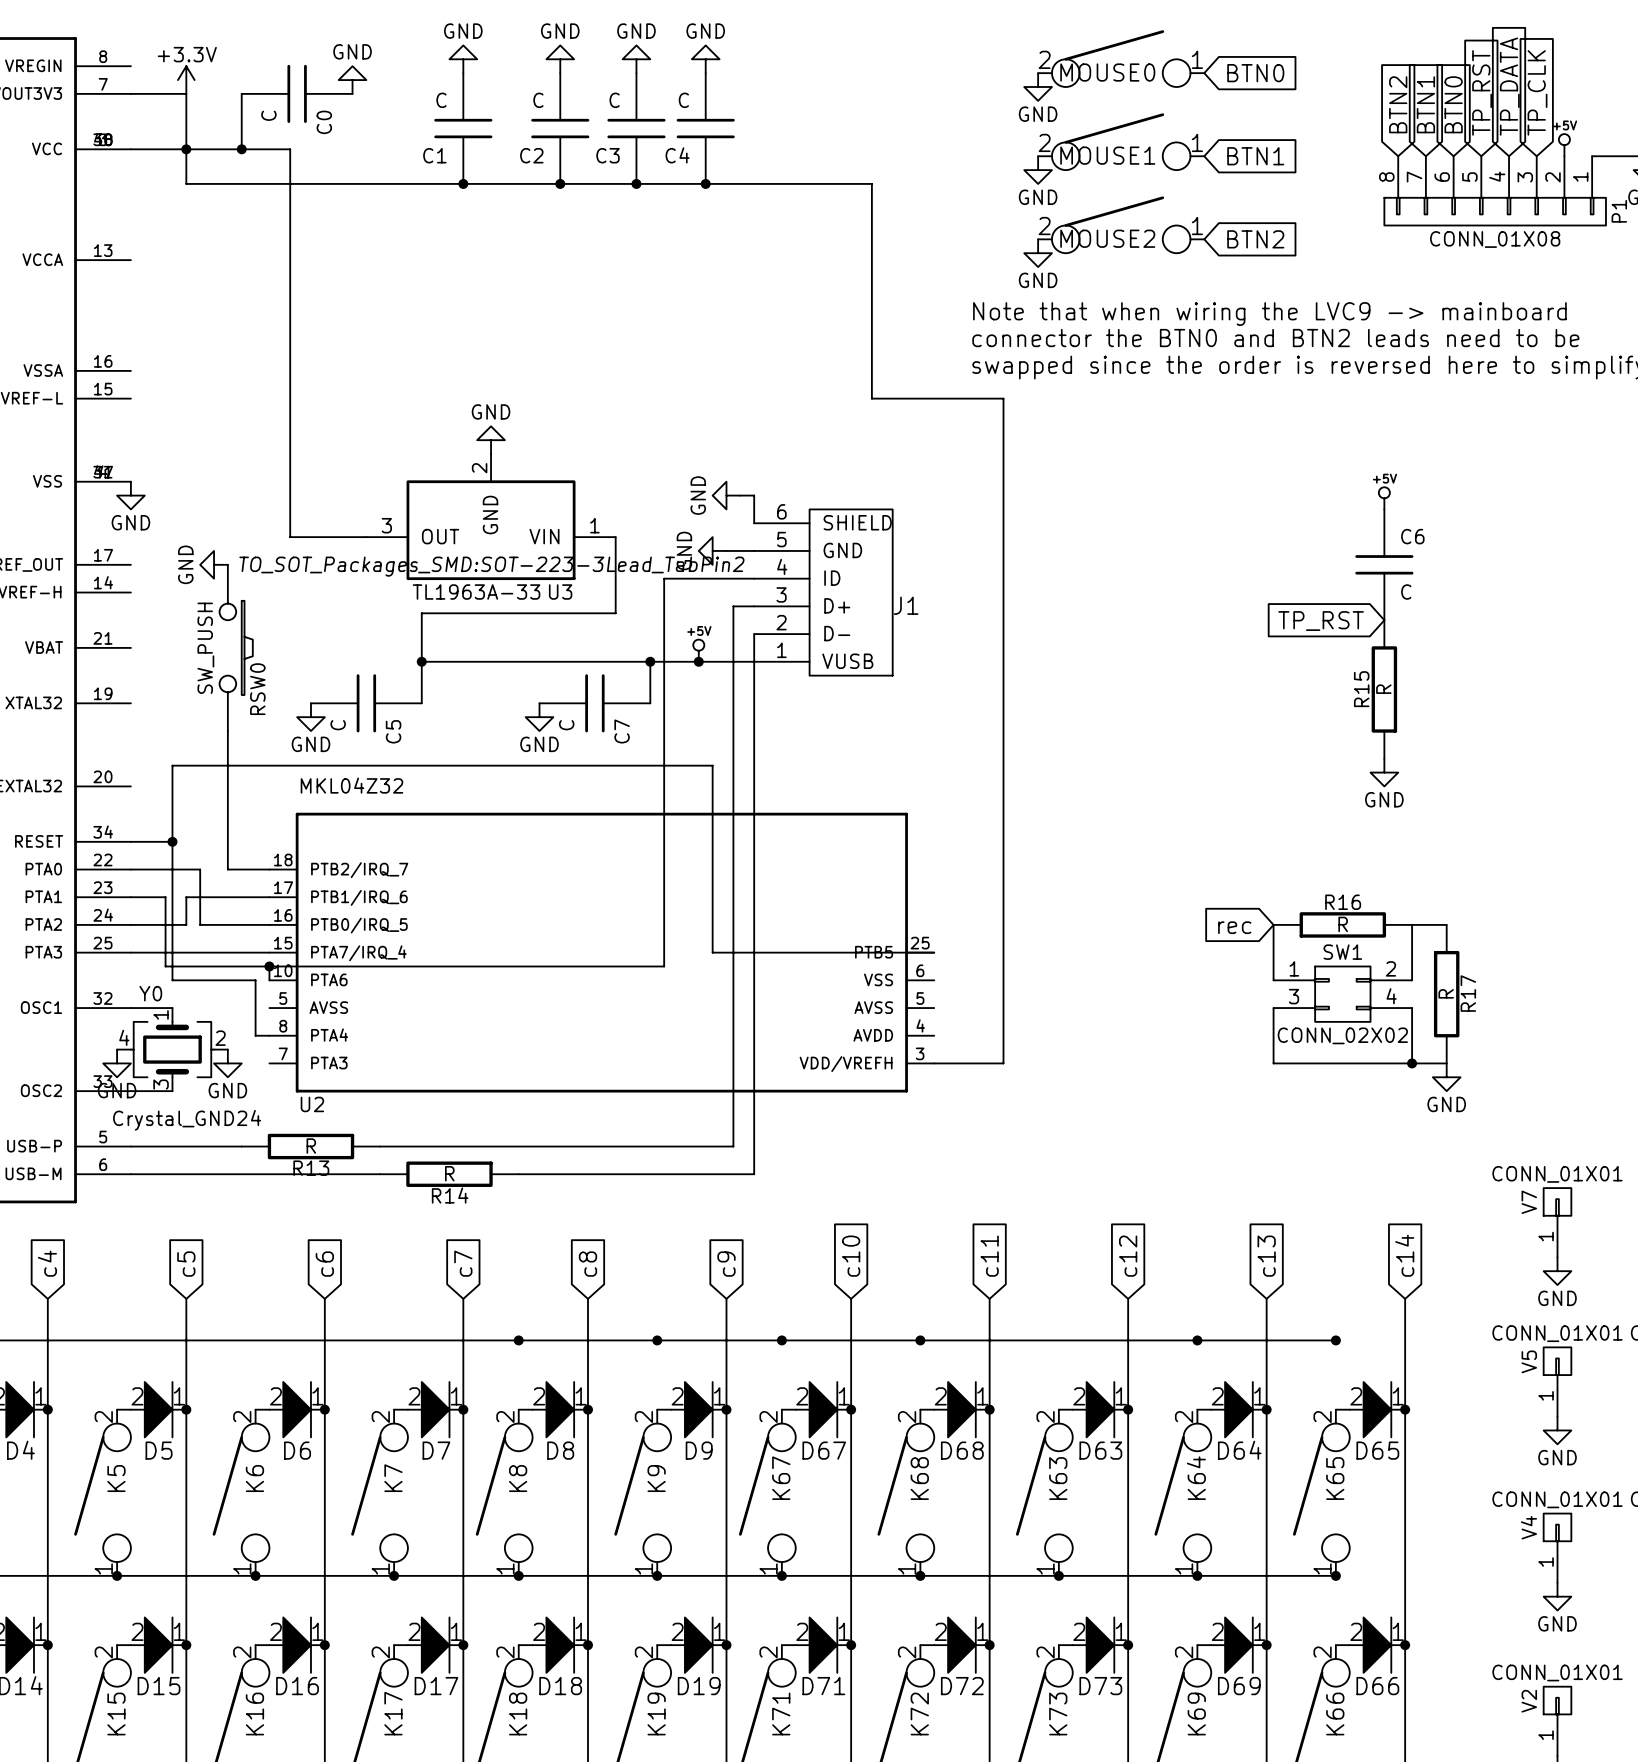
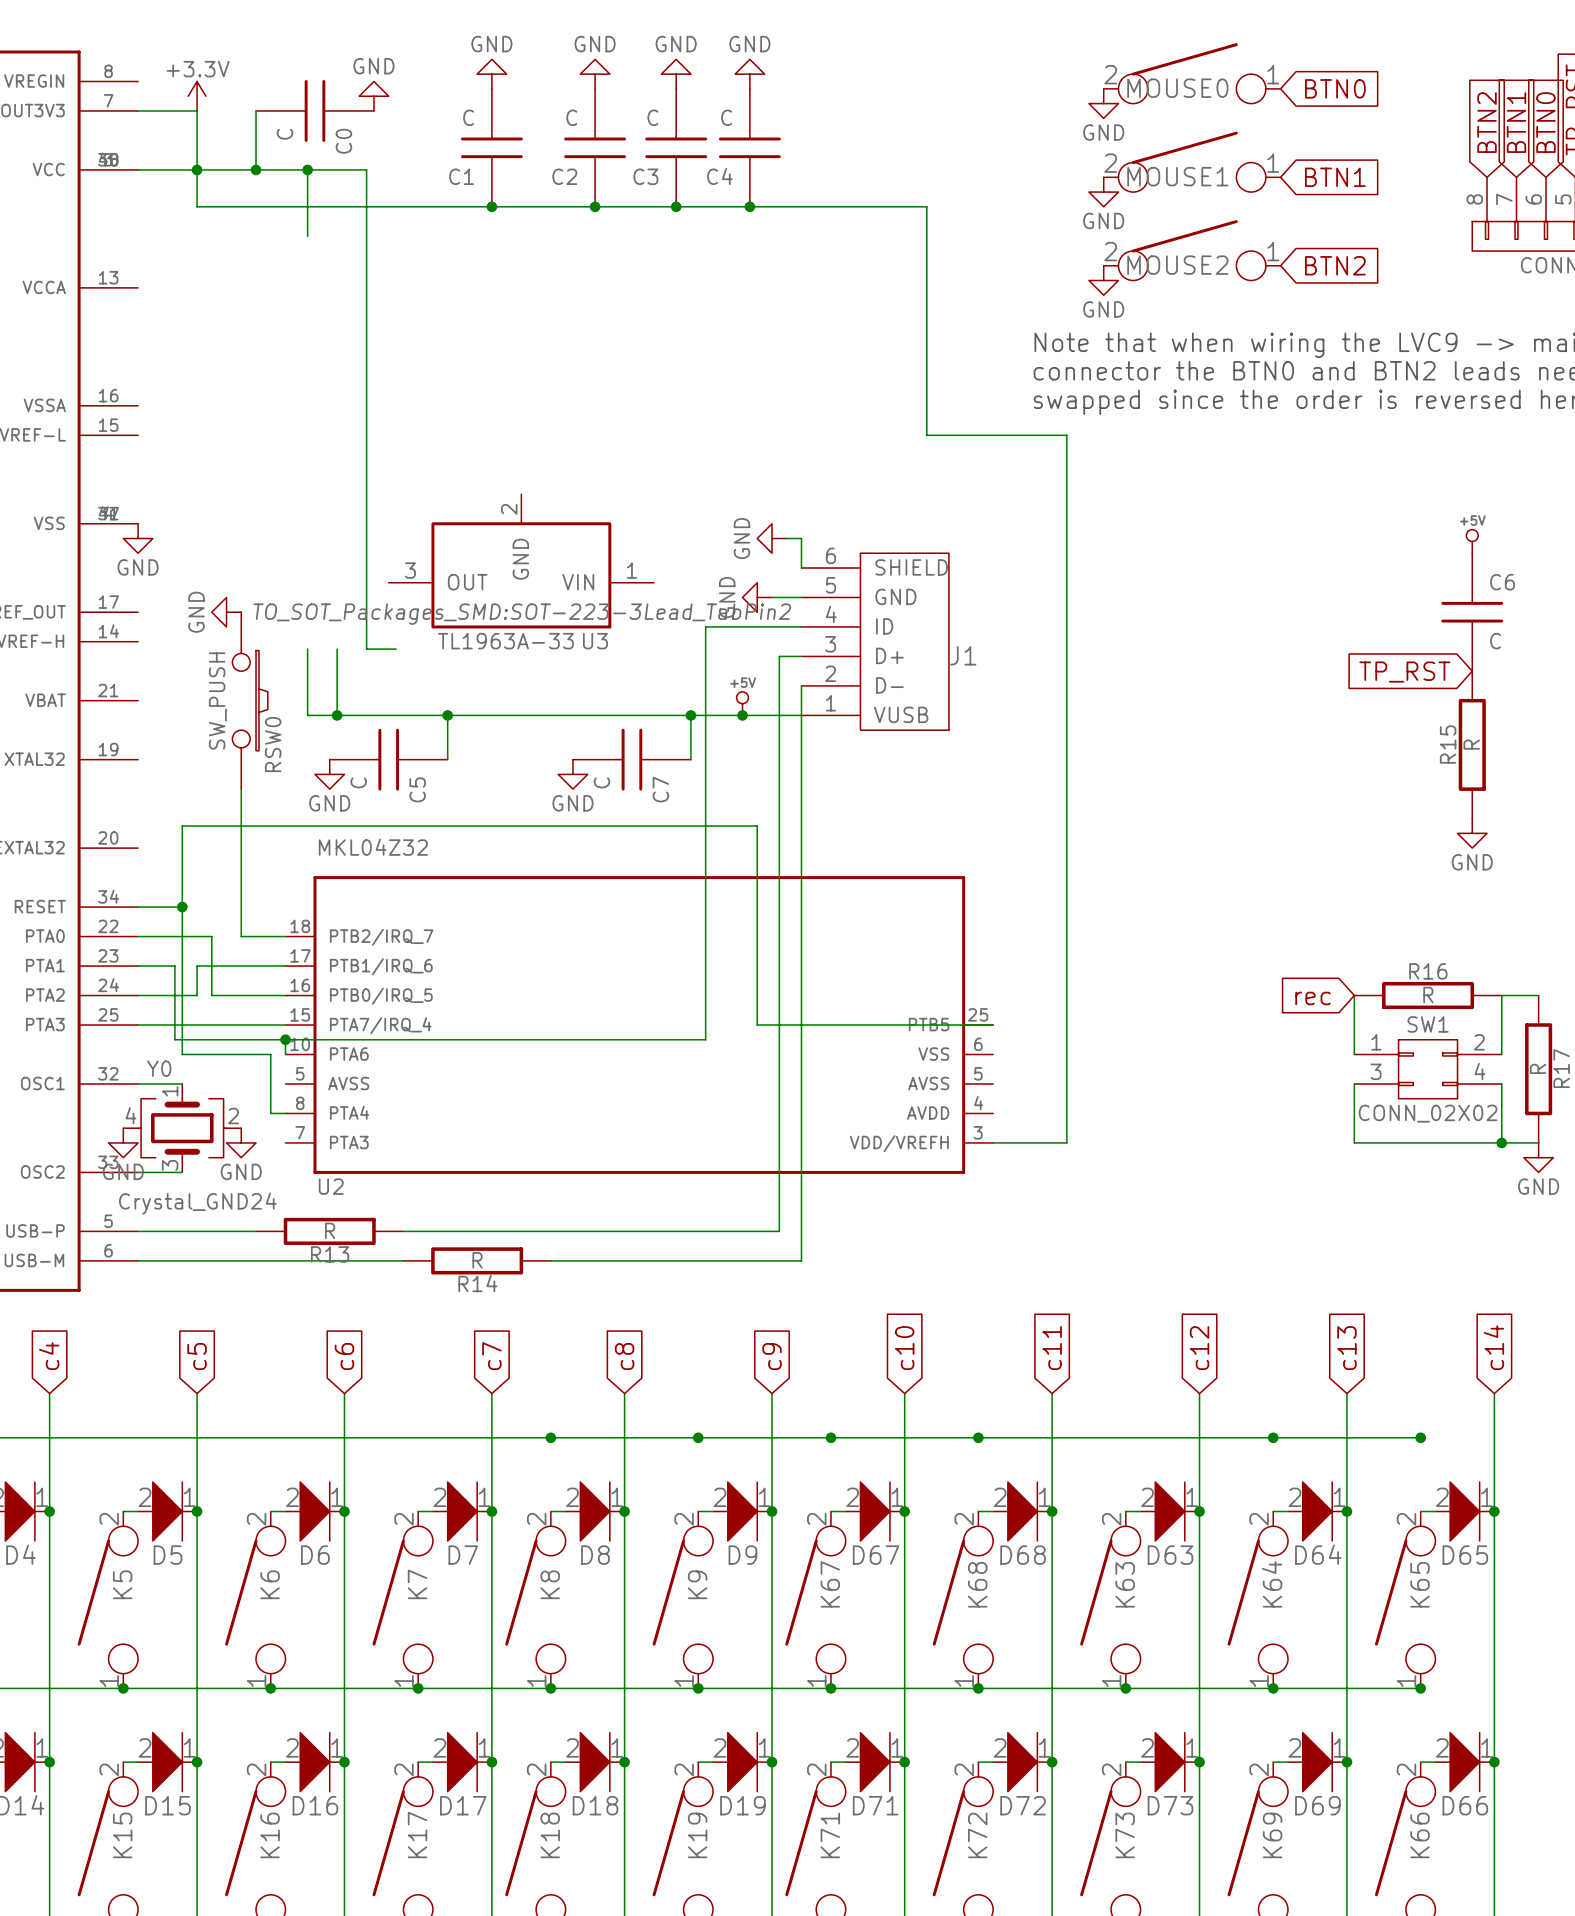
wire: none -> (307, 169) (366, 169) (366, 649) (396, 649)
junction: none -> (307, 169)
wire: (290, 211) (290, 537) (366, 537) -> none
power symbol: GND (491, 440) -> none
wire: (615, 537) (615, 613) (421, 613) (421, 661) -> (307, 649) (307, 715) (447, 715)
wire: none -> (337, 649) (337, 715)
junction: none -> (337, 715)

